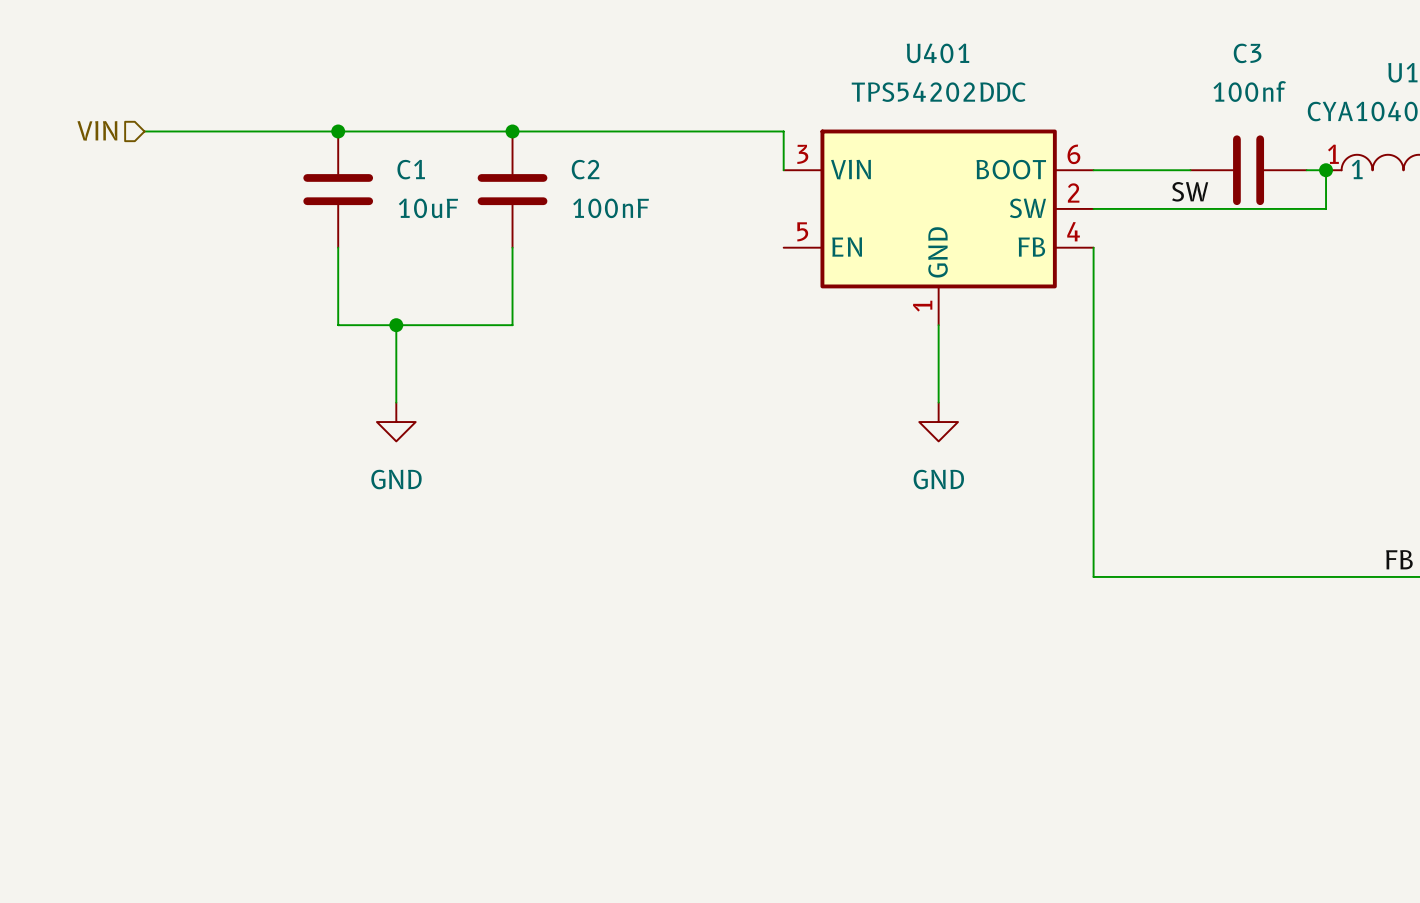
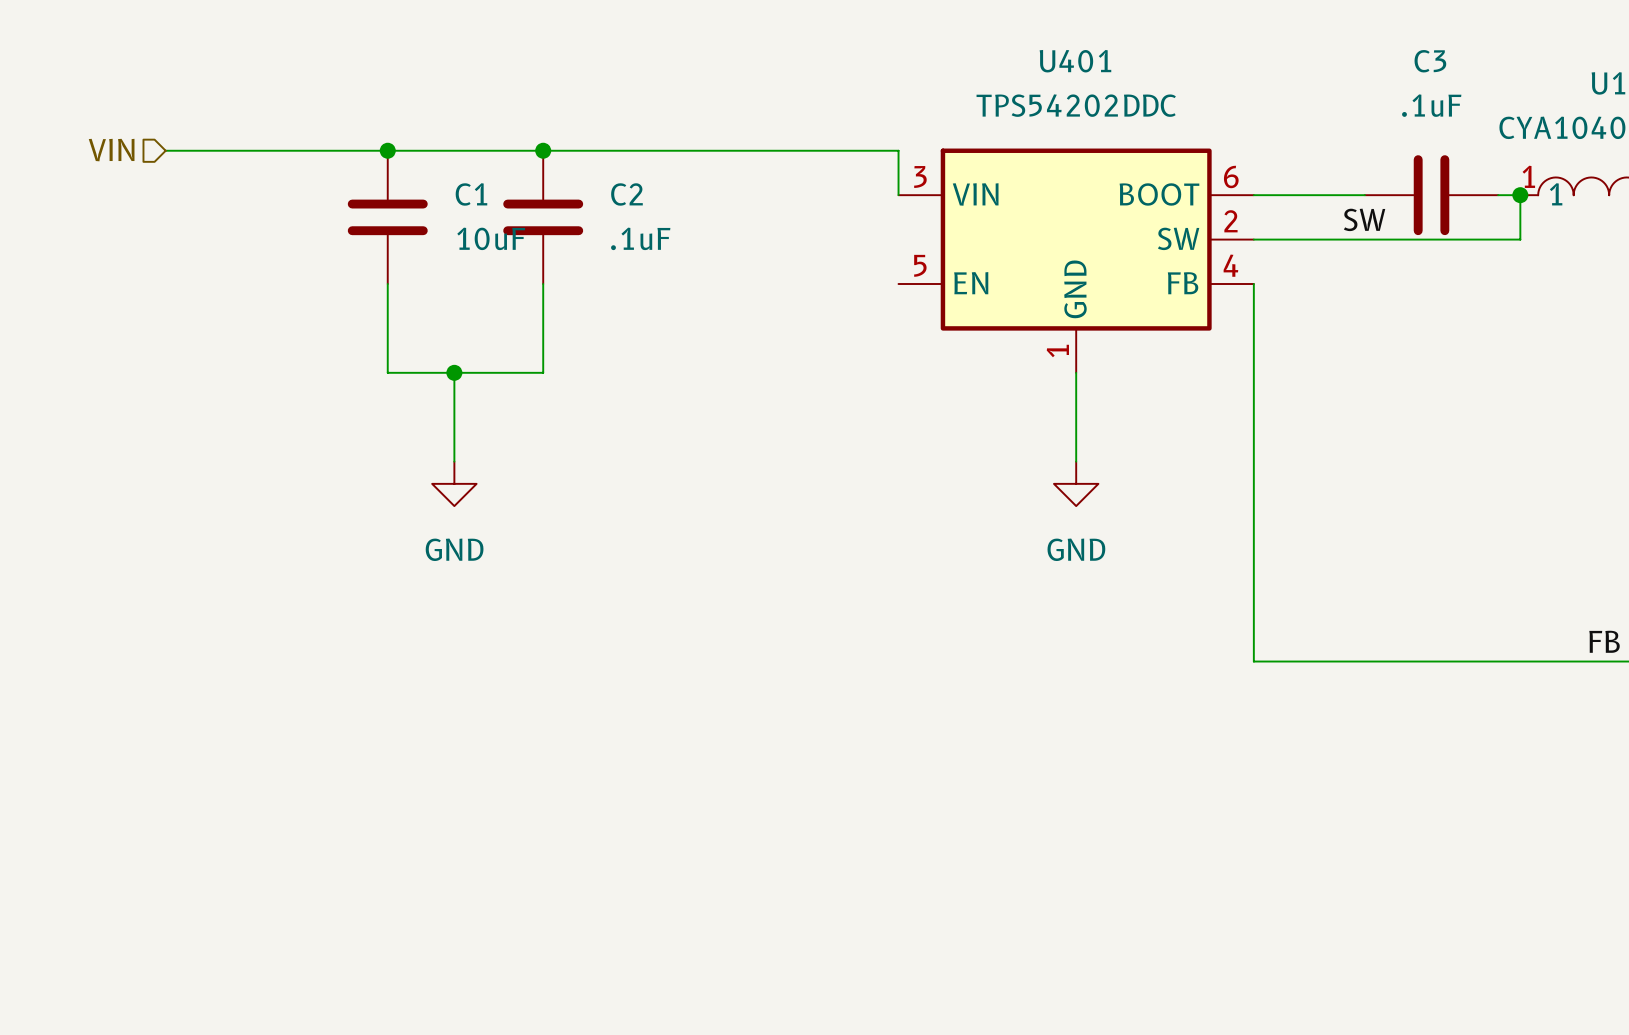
C3 value: 100nf (1249, 91) -> .1uF (1431, 105)
junction position: (512, 131) -> (543, 150)
C2 position: (512, 189) -> (543, 217)
C2 value: 100nF (611, 208) -> .1uF (640, 238)
wire: (512, 247) (512, 325) (473, 325) -> (543, 283) (543, 372)

